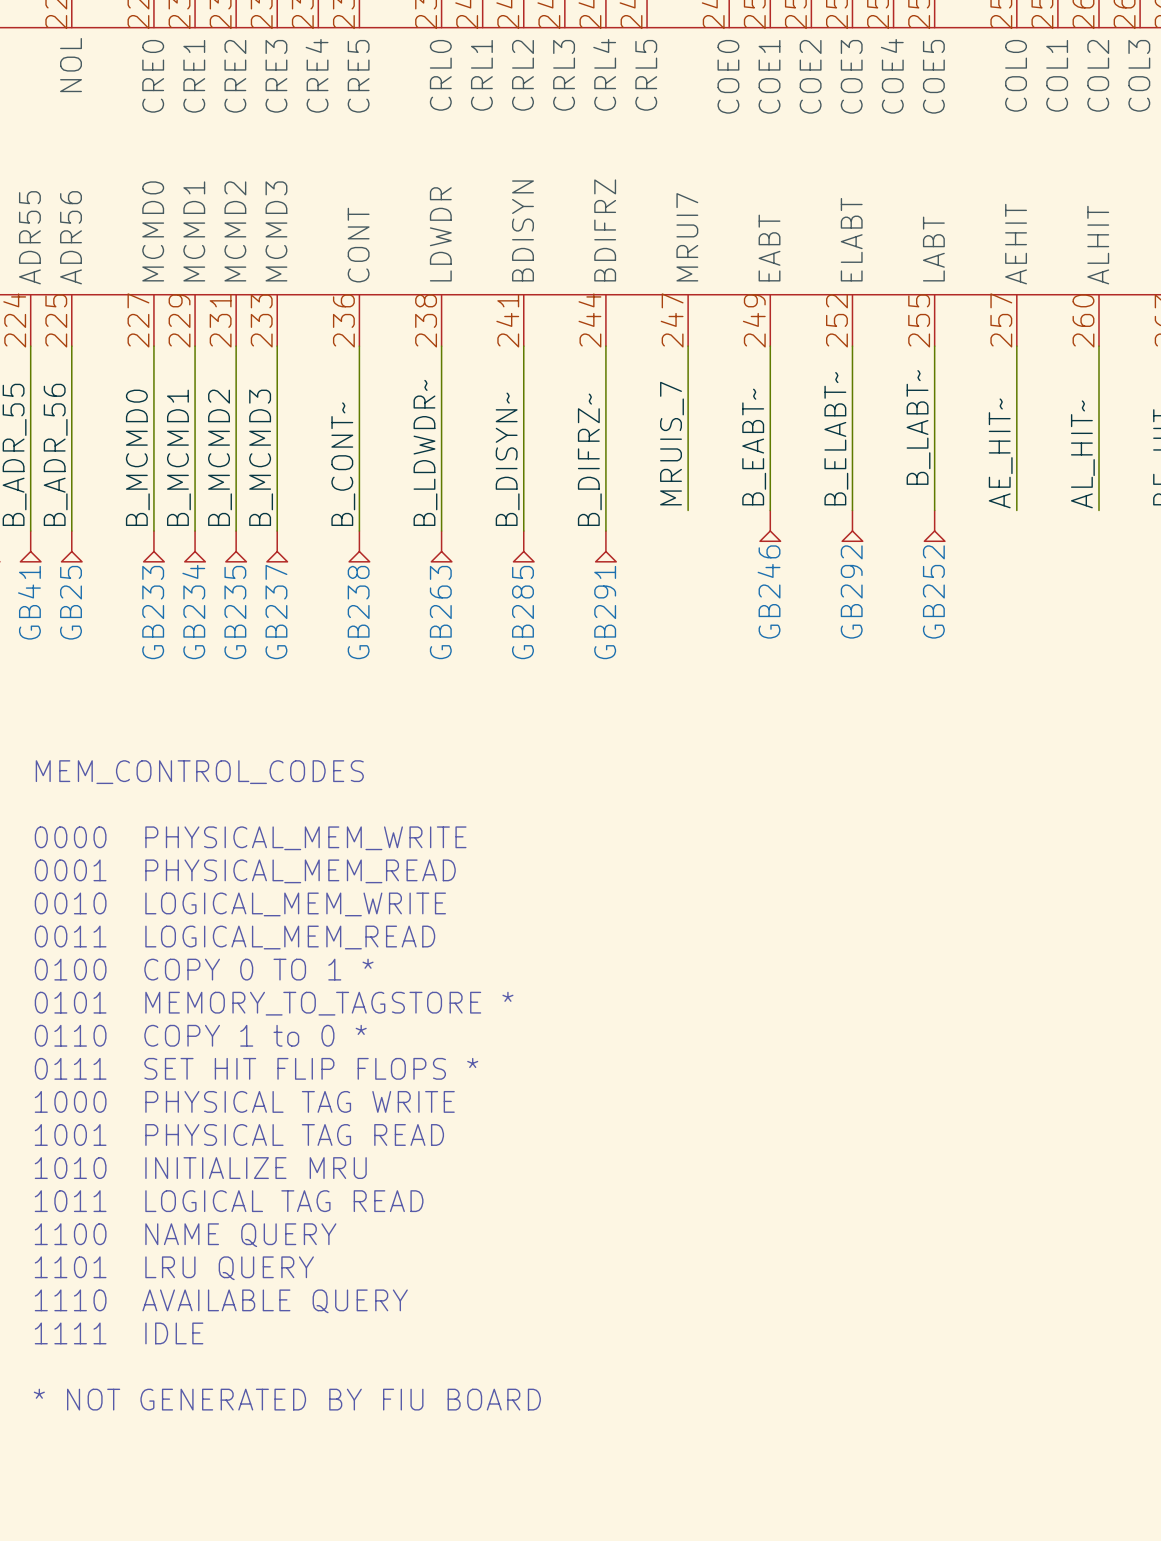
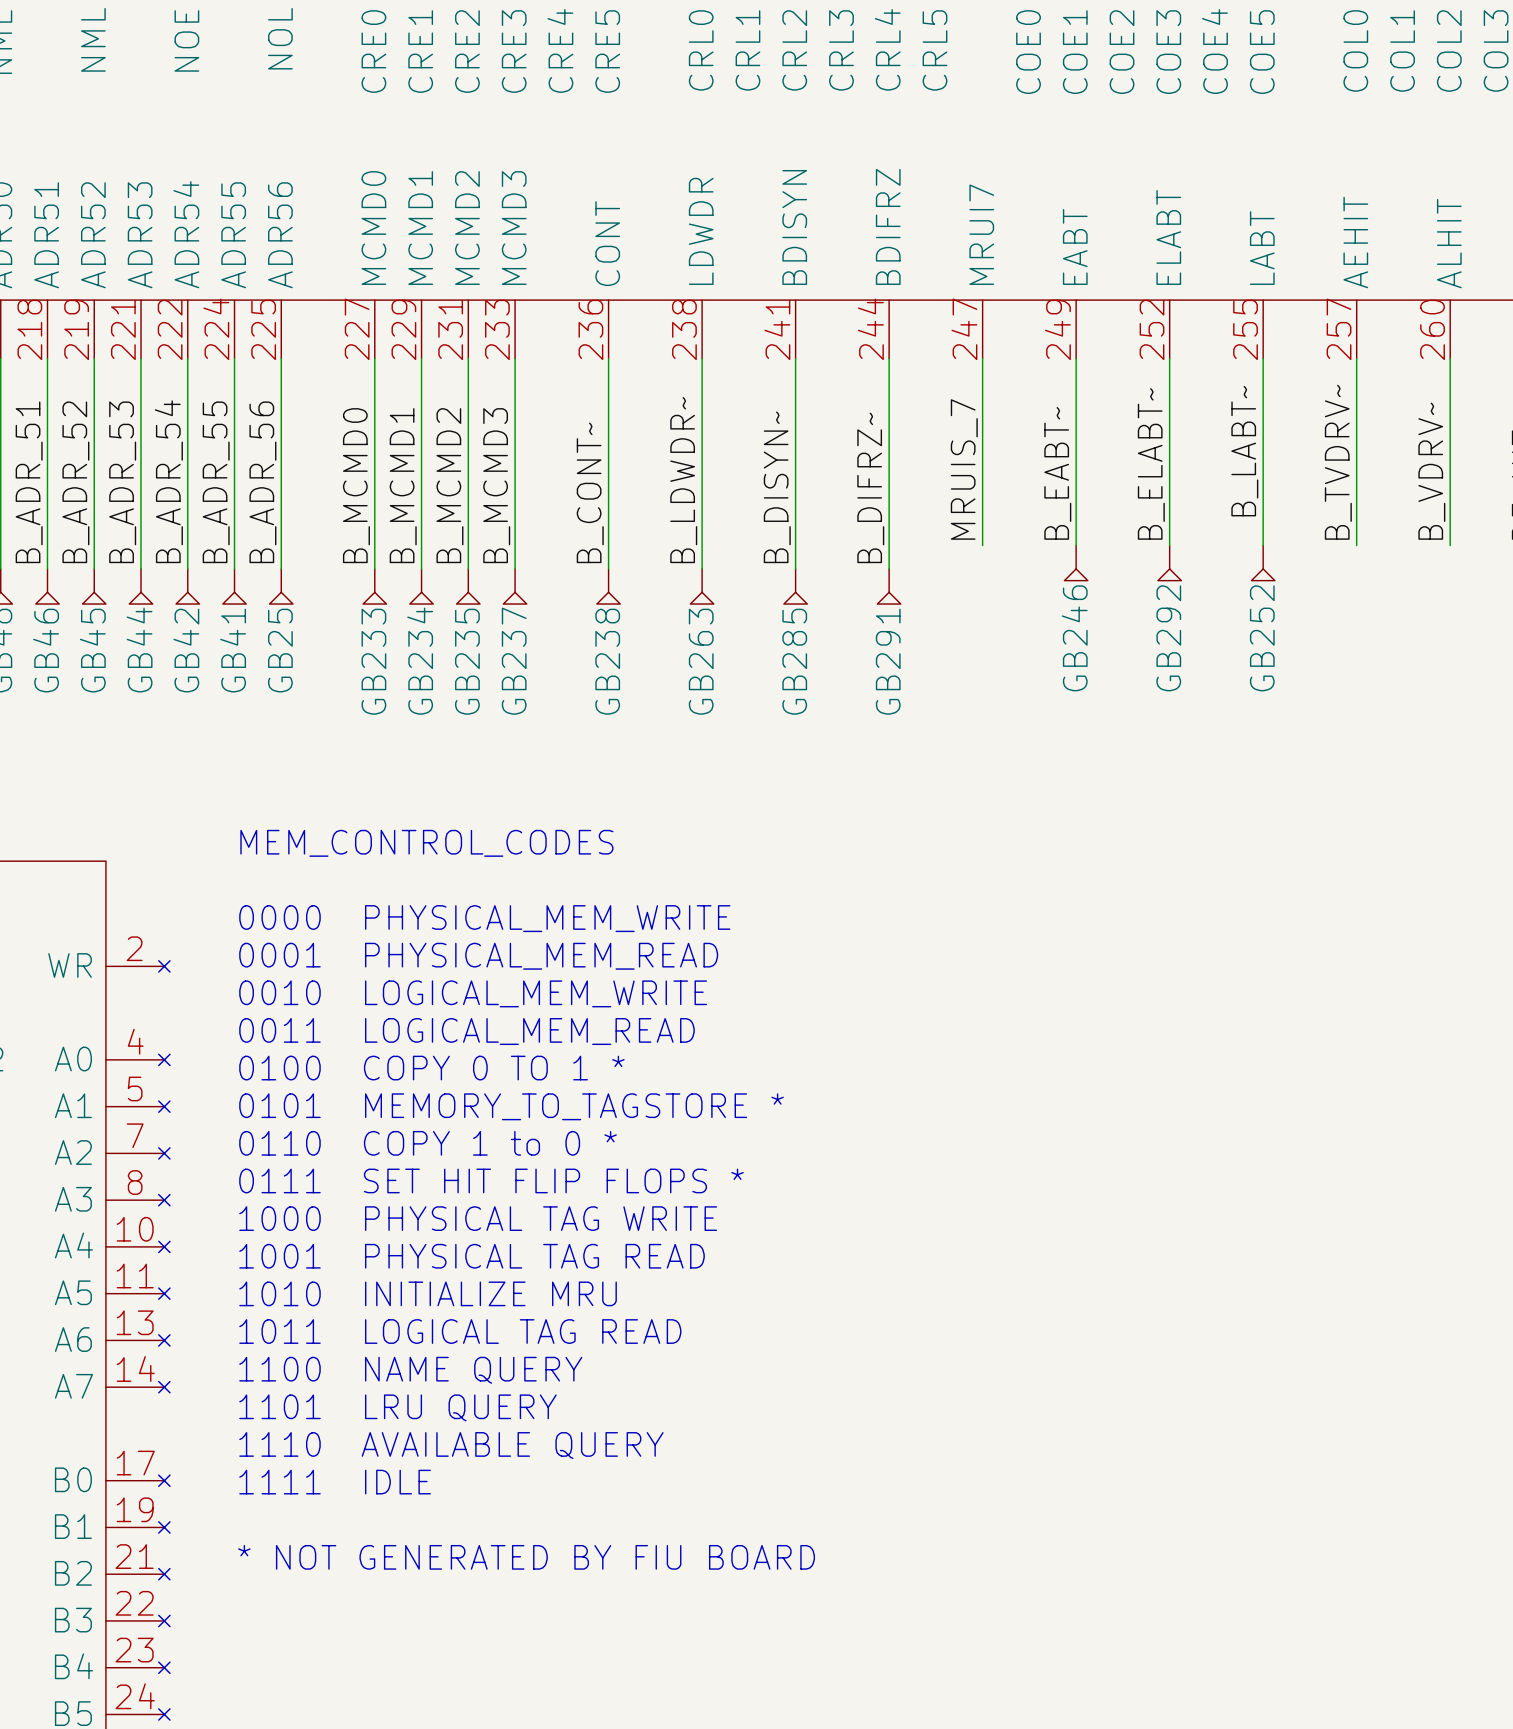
label: AE_HIT~ (1000, 453) -> B_TVDRV~ (1338, 462)
label: AL_HIT~ (1082, 454) -> B_VDRV~ (1431, 471)

